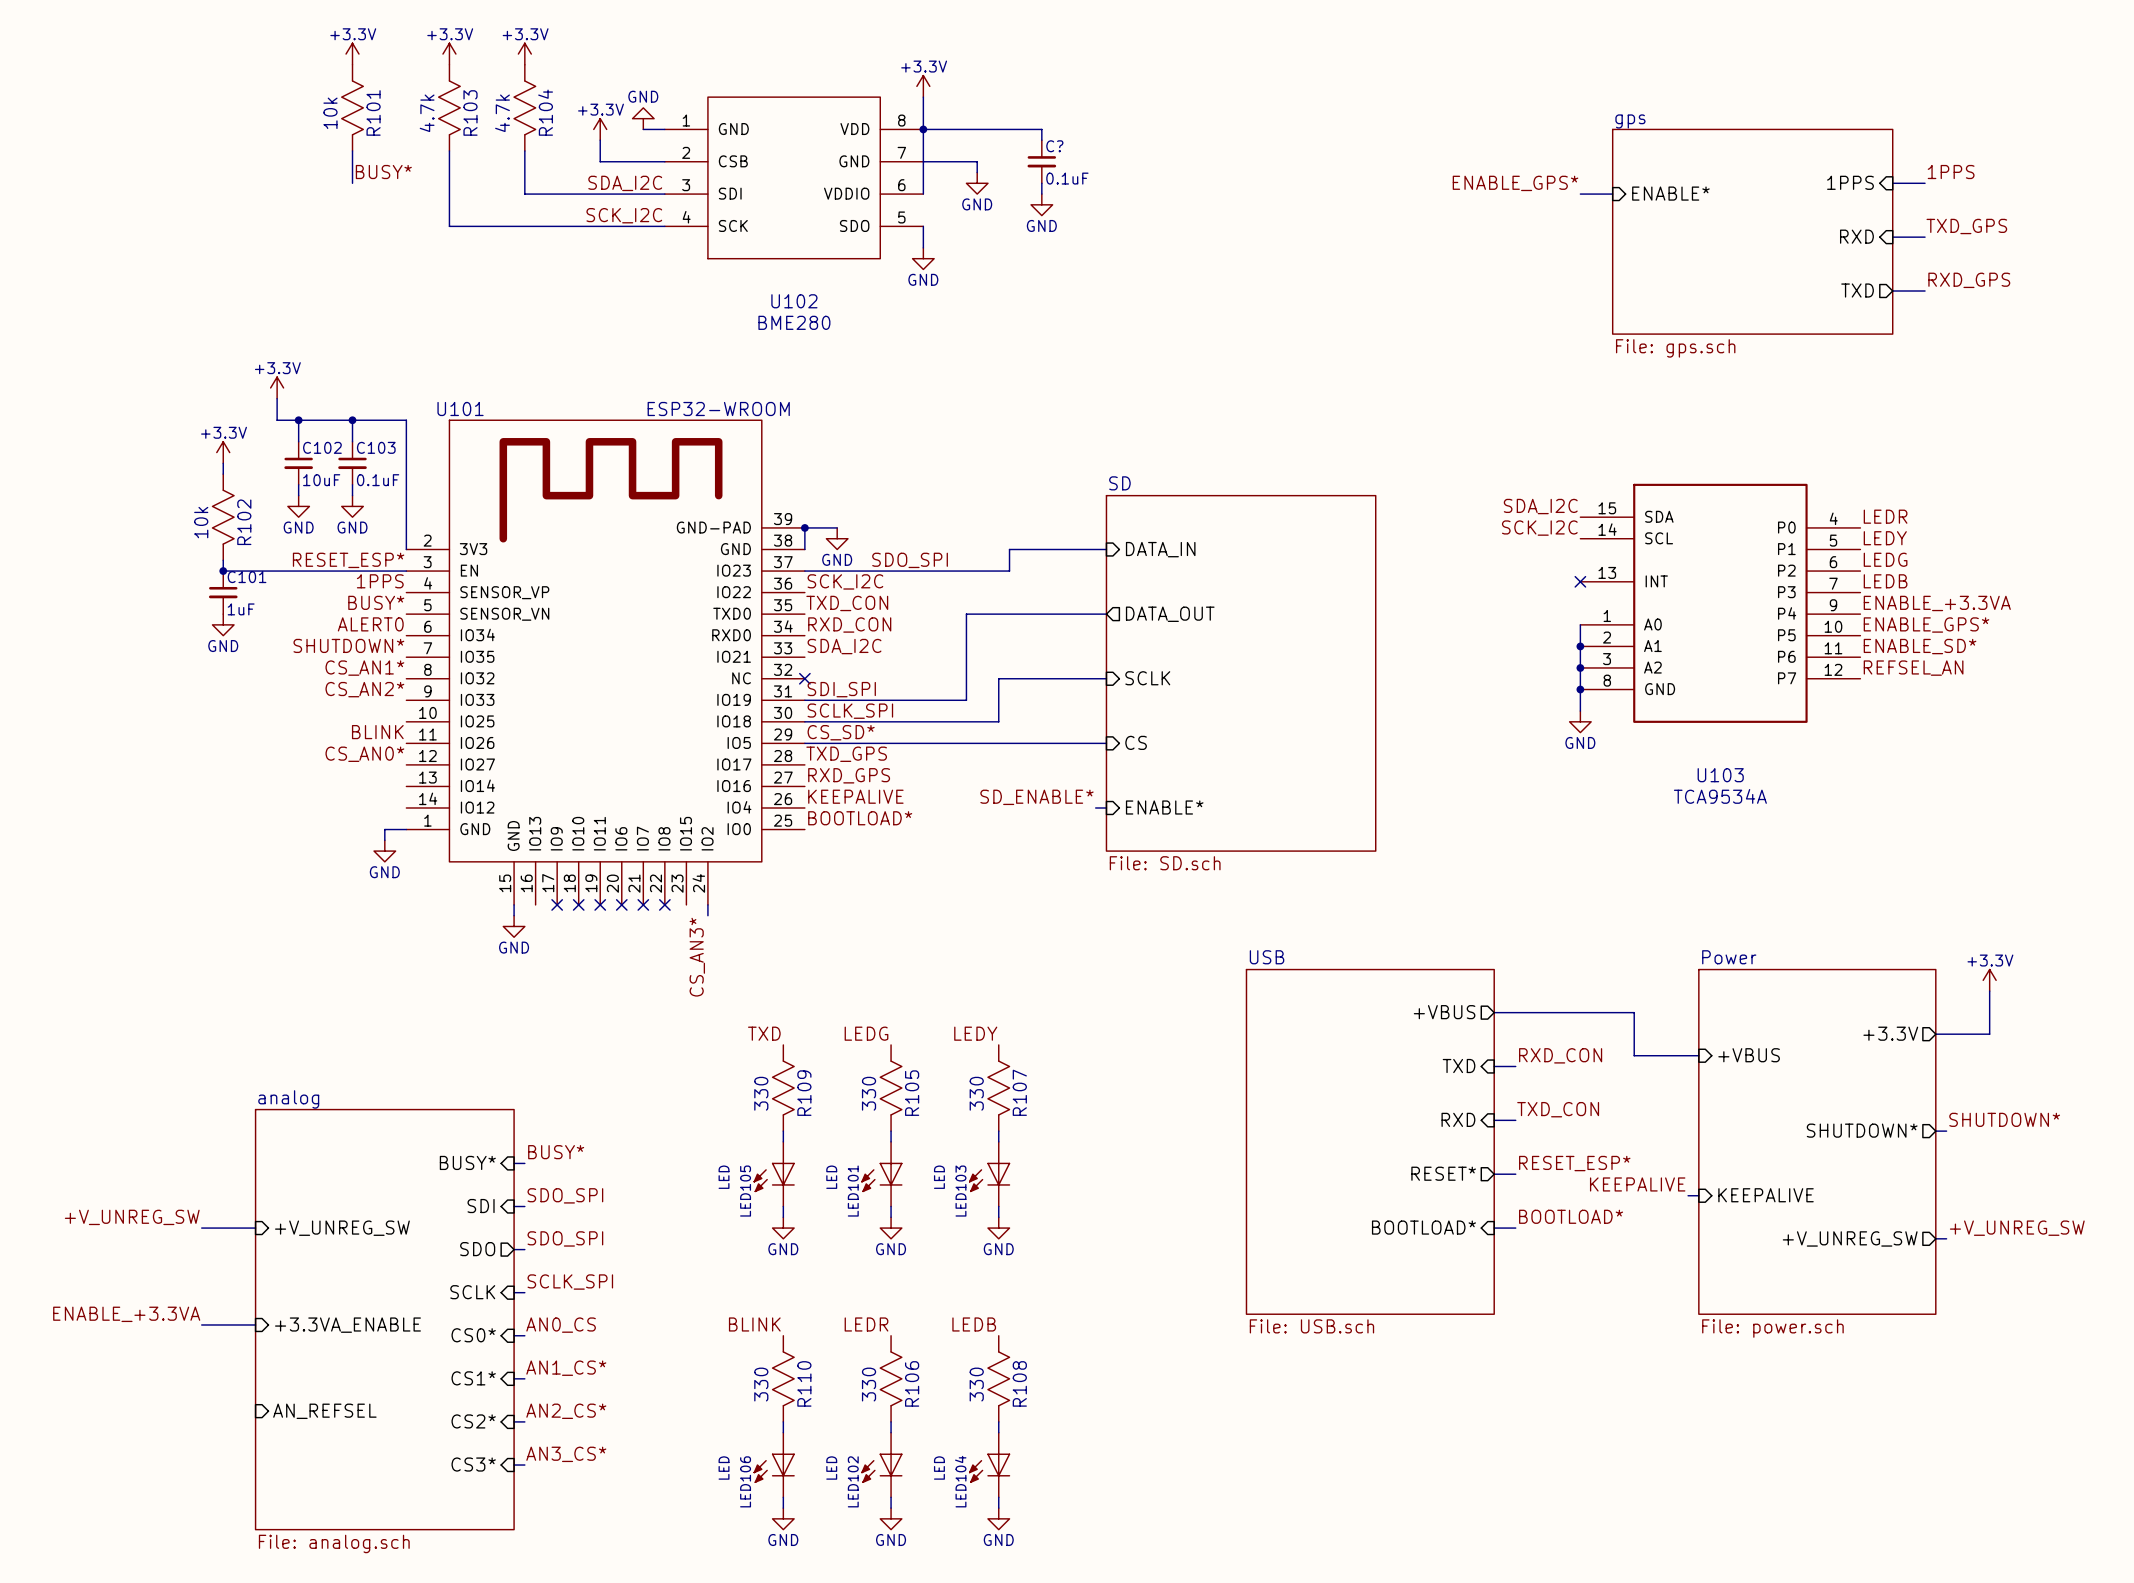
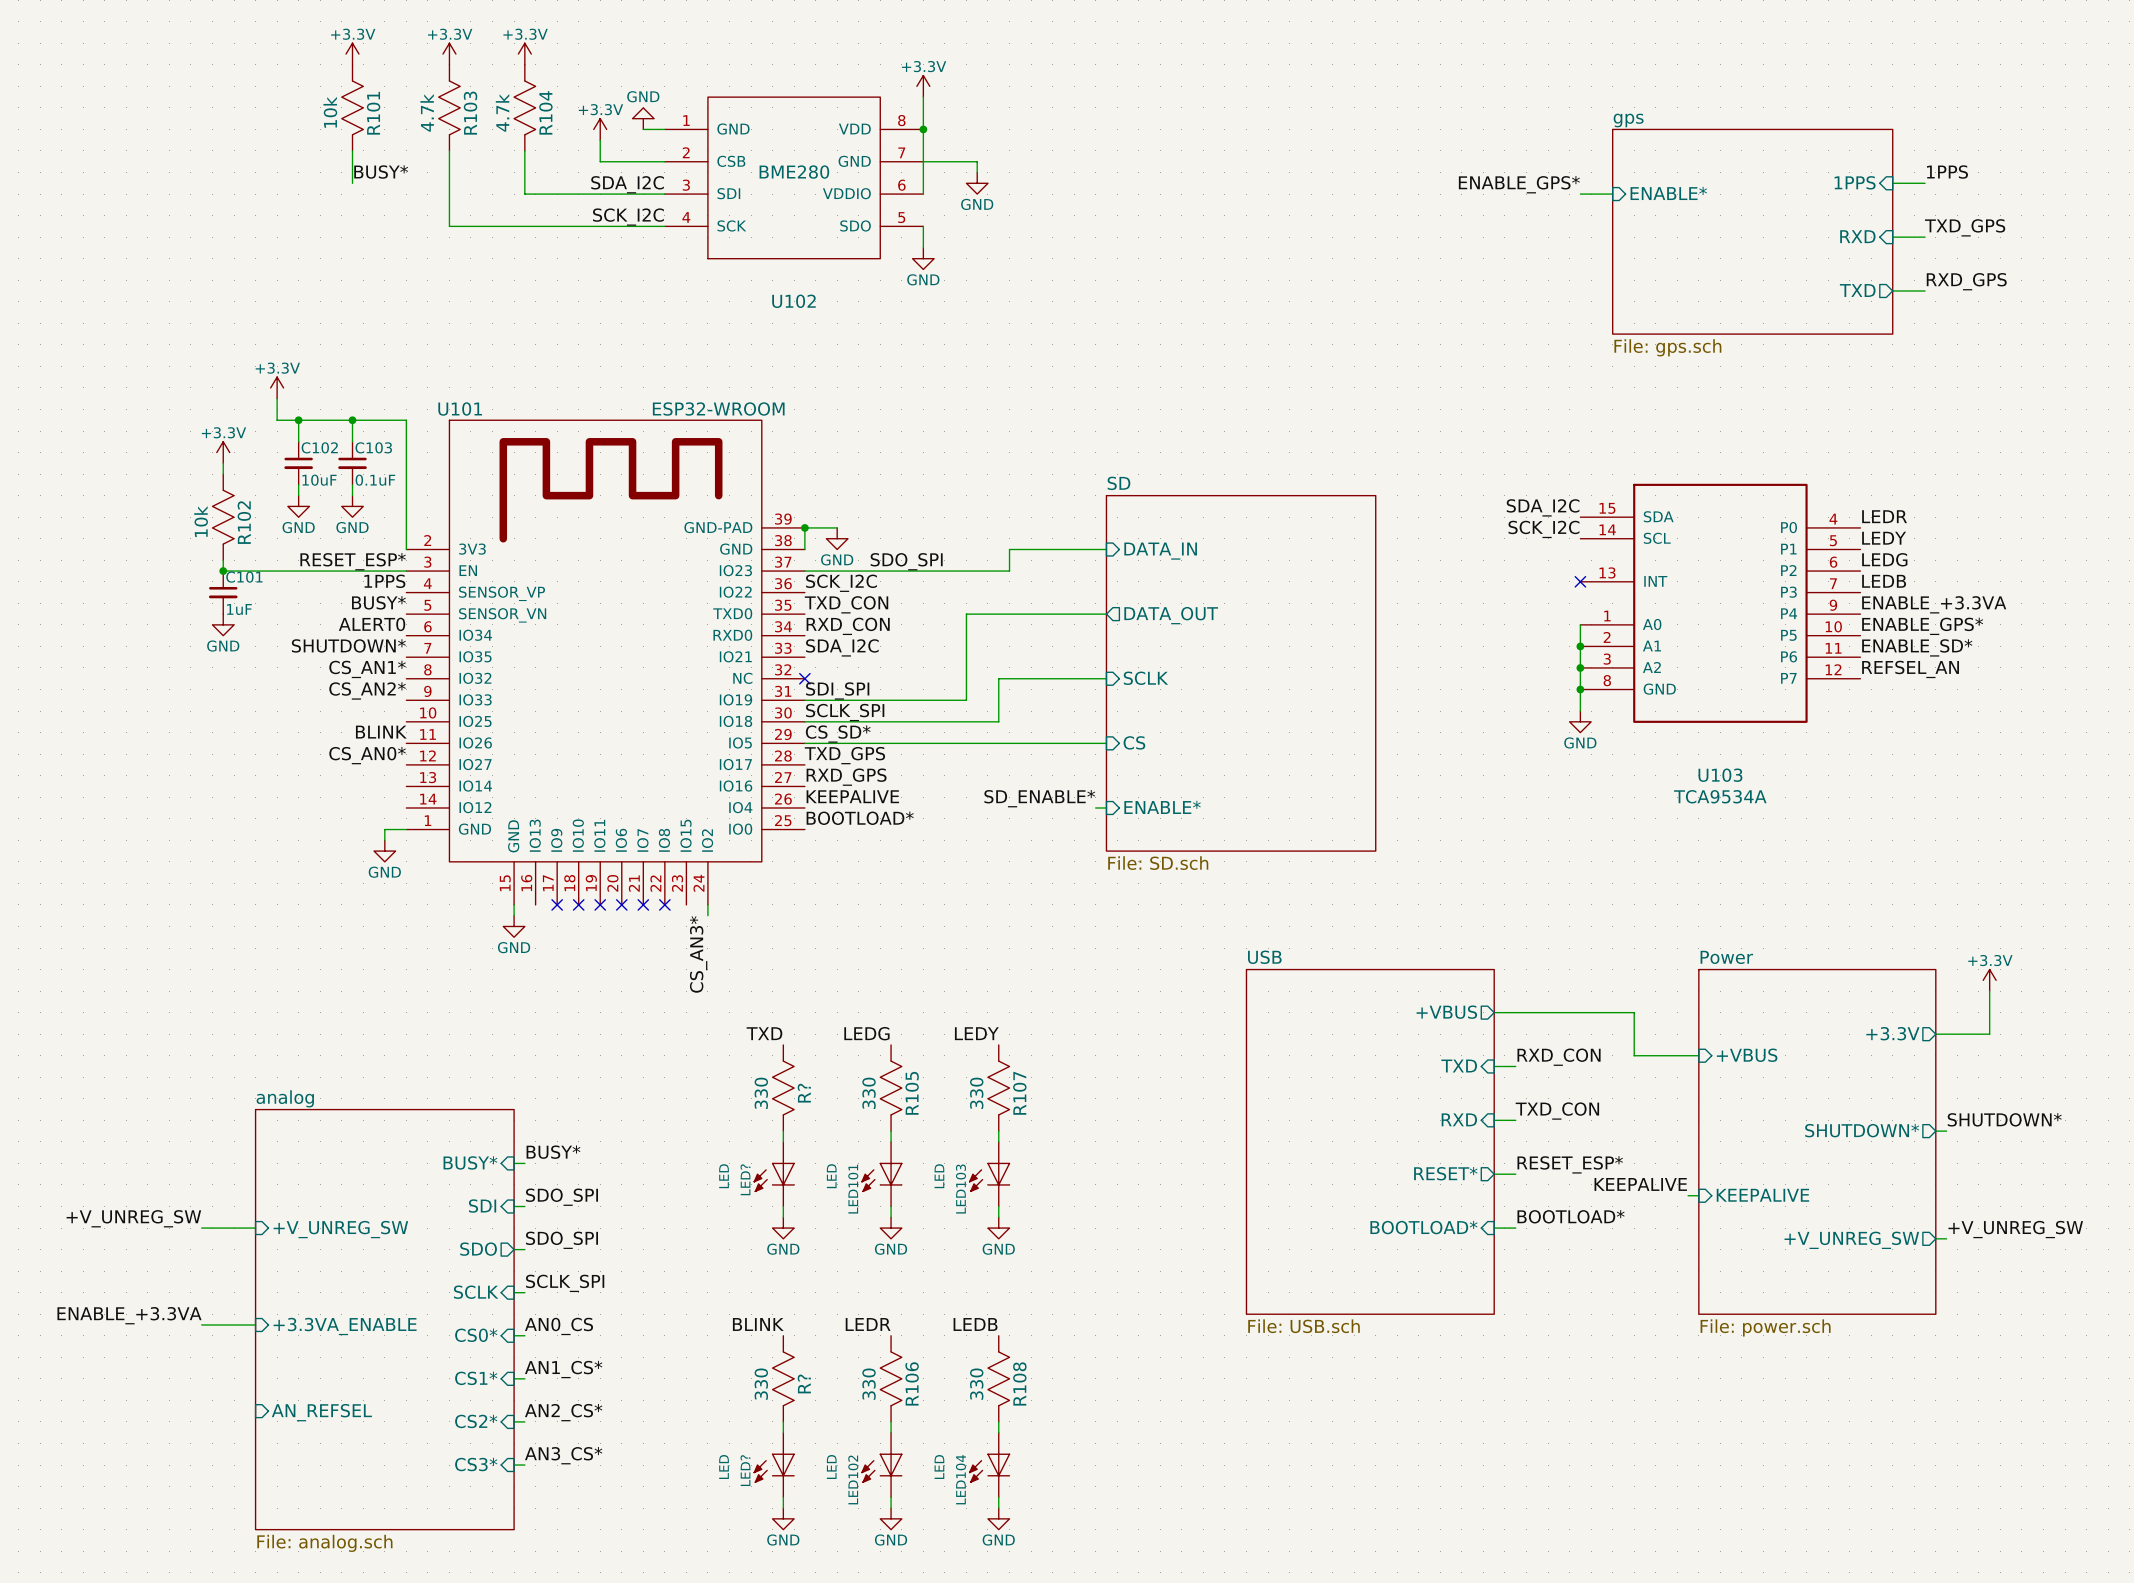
wire: (923, 129) (1041, 129) (1041, 140) -> none
C?: 0.1uF (1041, 161) -> none
wire: (1041, 183) (1041, 194) -> none
power symbol: GND (1041, 204) -> none
U102 value position: BME280 (794, 322) -> BME280 (794, 172)
R109 name: R109 (804, 1093) -> R? (804, 1093)
LED105 name: LED105 (745, 1191) -> LED? (745, 1179)
R110 name: R110 (804, 1383) -> R? (804, 1383)
LED106 name: LED106 (745, 1481) -> LED? (745, 1470)

